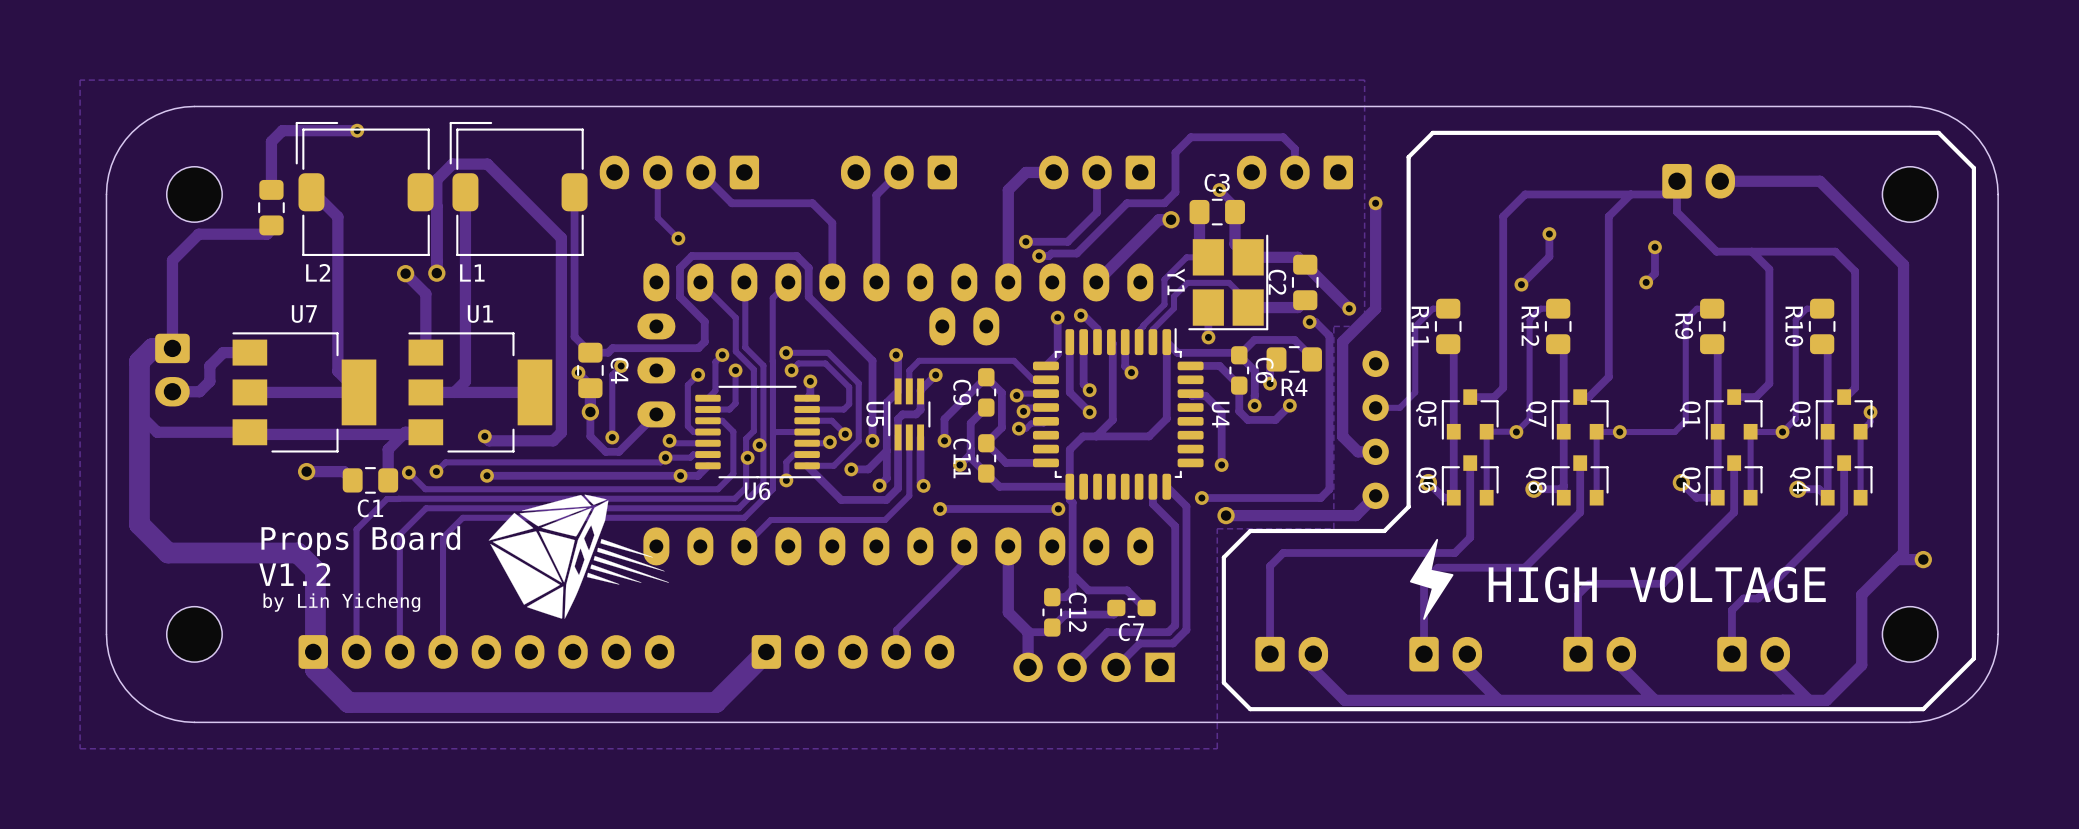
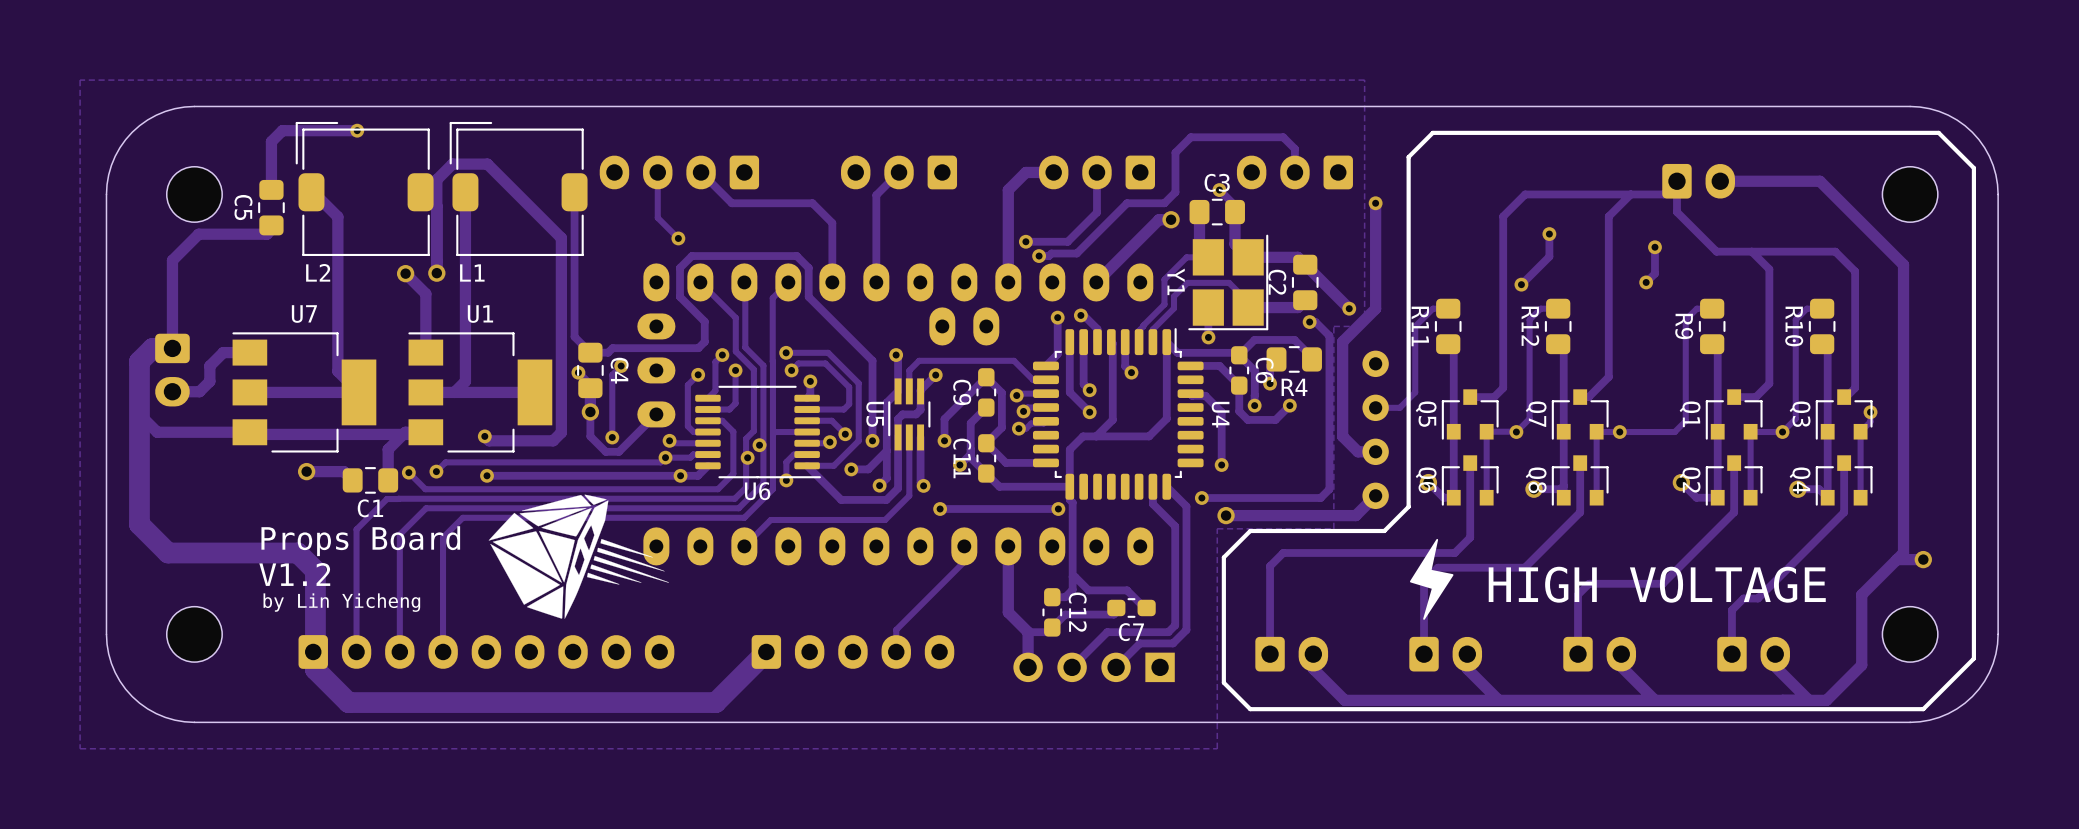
C5 name: none -> C5 (243, 207)

